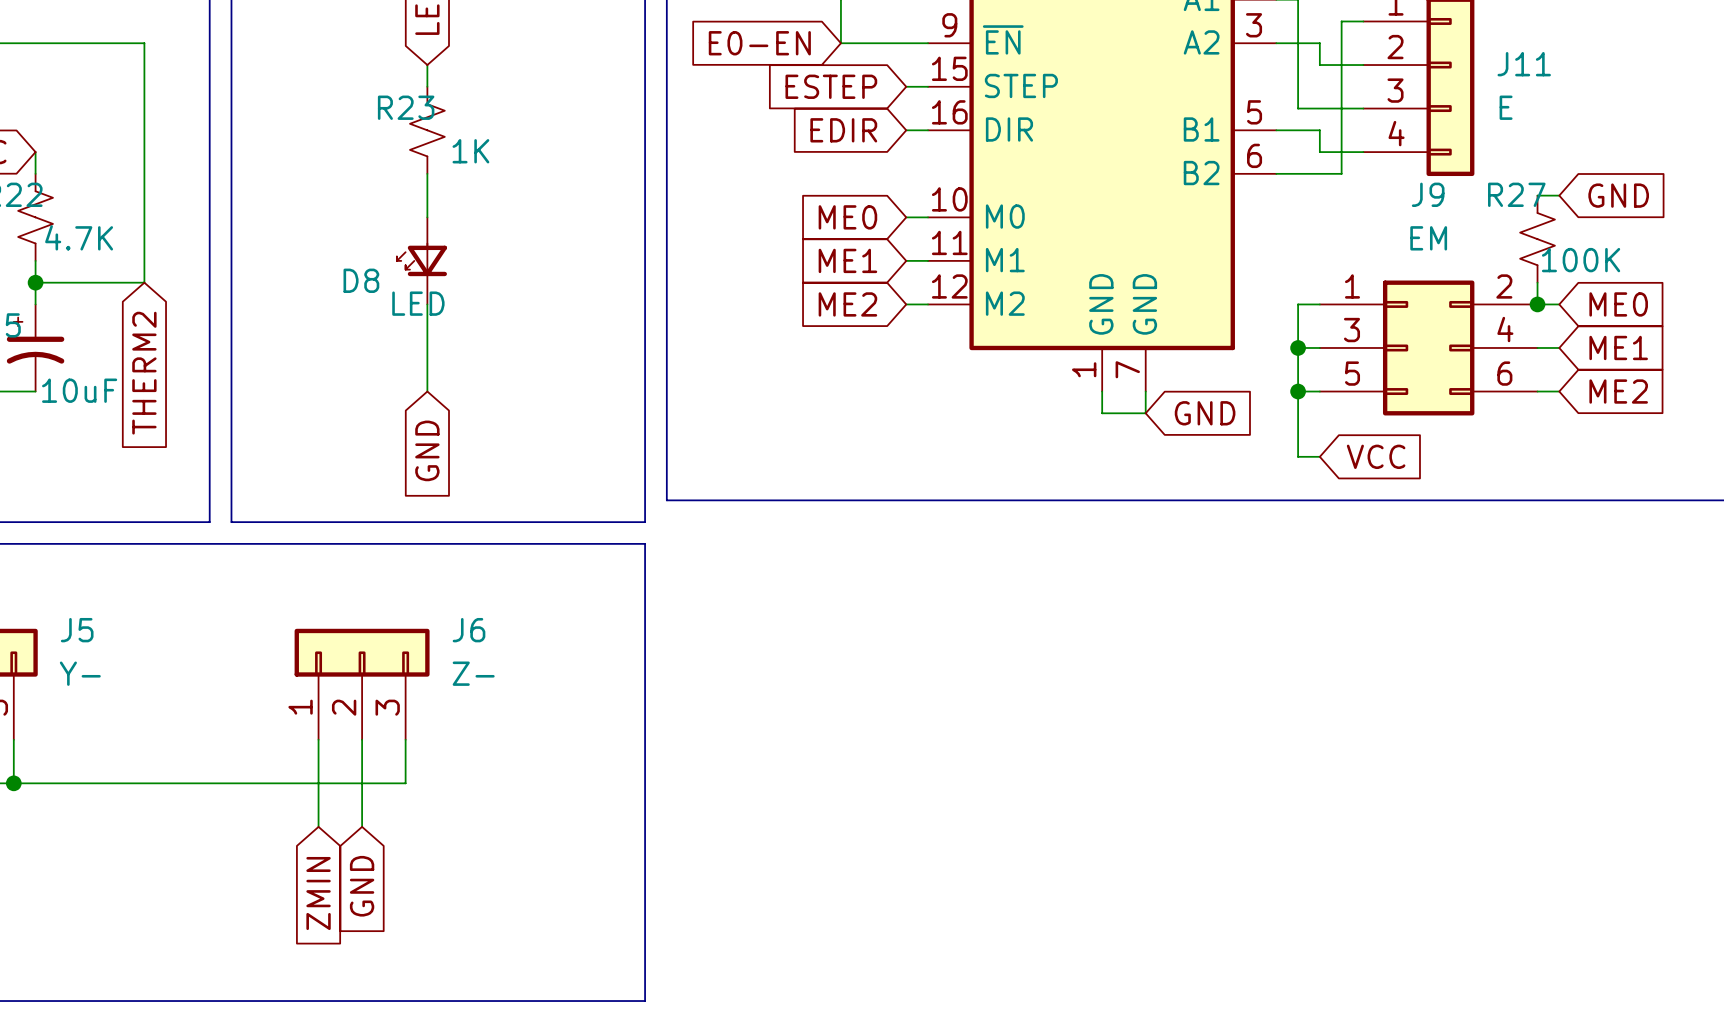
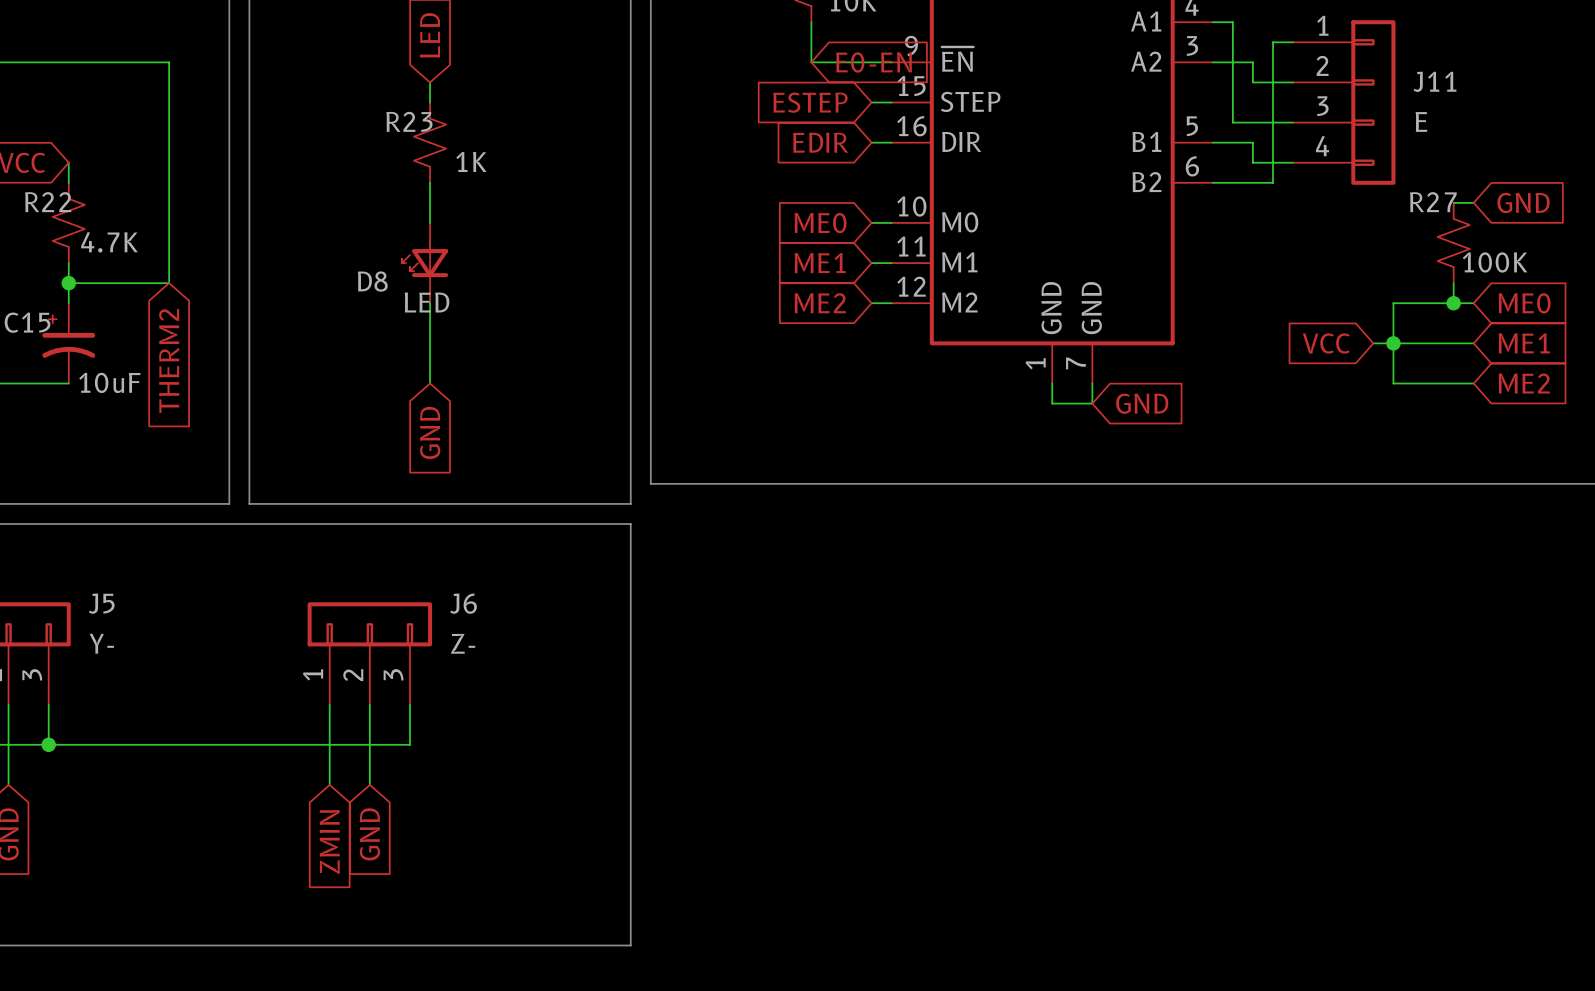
global label rotation: 0° (759, 43) -> 180° (873, 62)
wire: (1319, 304) (1298, 304) (1298, 456) (1319, 456) -> none
wire: (1298, 347) (1319, 347) -> none
junction: (1298, 347) -> none
J9: EM (1428, 347) -> none
junction: none -> (1393, 343)
wire: (1298, 391) (1319, 391) -> none
junction: (1298, 391) -> none
global label rotation: 0° (1376, 456) -> 180° (1326, 343)

